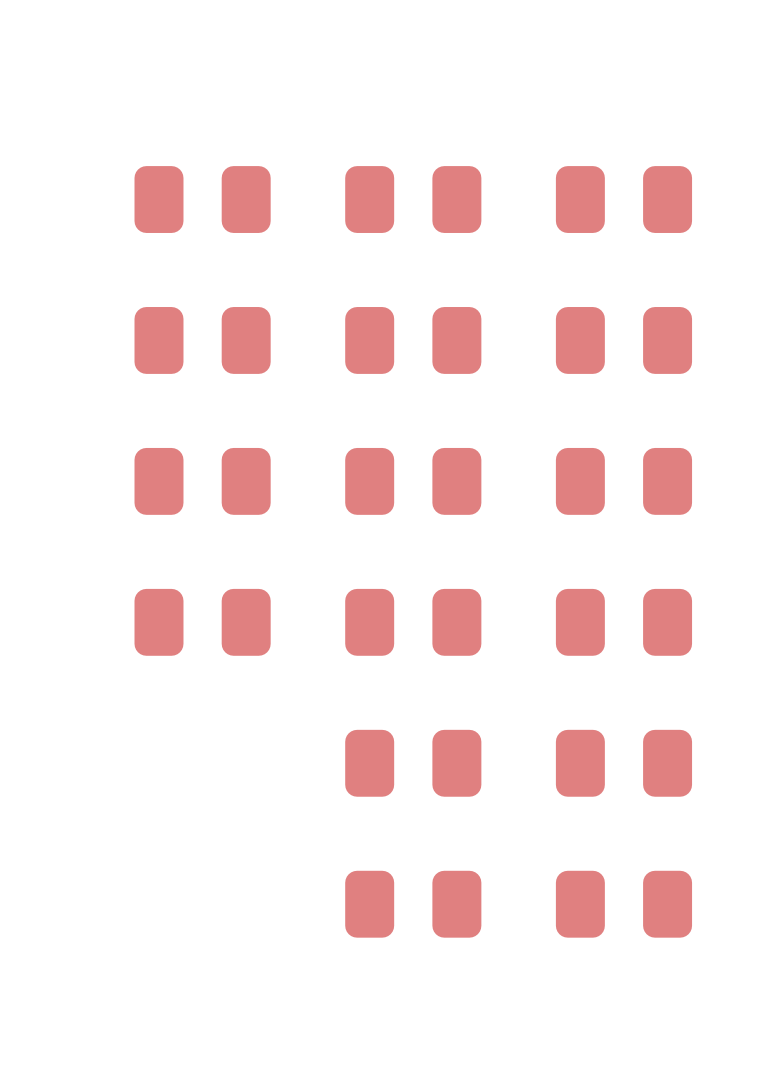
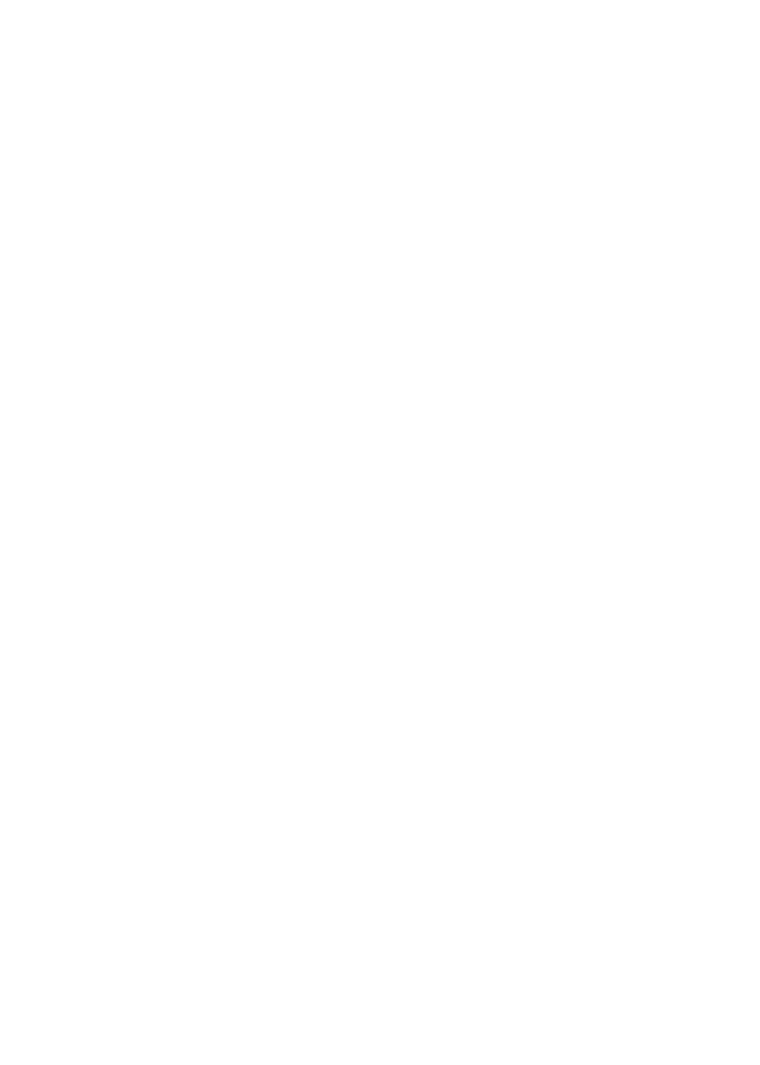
part: (202, 199) -> none
part: (413, 199) -> none
part: (623, 199) -> none
part: (202, 340) -> none
part: (413, 340) -> none
part: (623, 340) -> none
part: (202, 481) -> none
part: (413, 481) -> none
part: (623, 481) -> none
part: (202, 622) -> none
part: (413, 622) -> none
part: (623, 622) -> none
part: (413, 763) -> none
part: (623, 763) -> none
part: (413, 904) -> none
part: (623, 904) -> none

